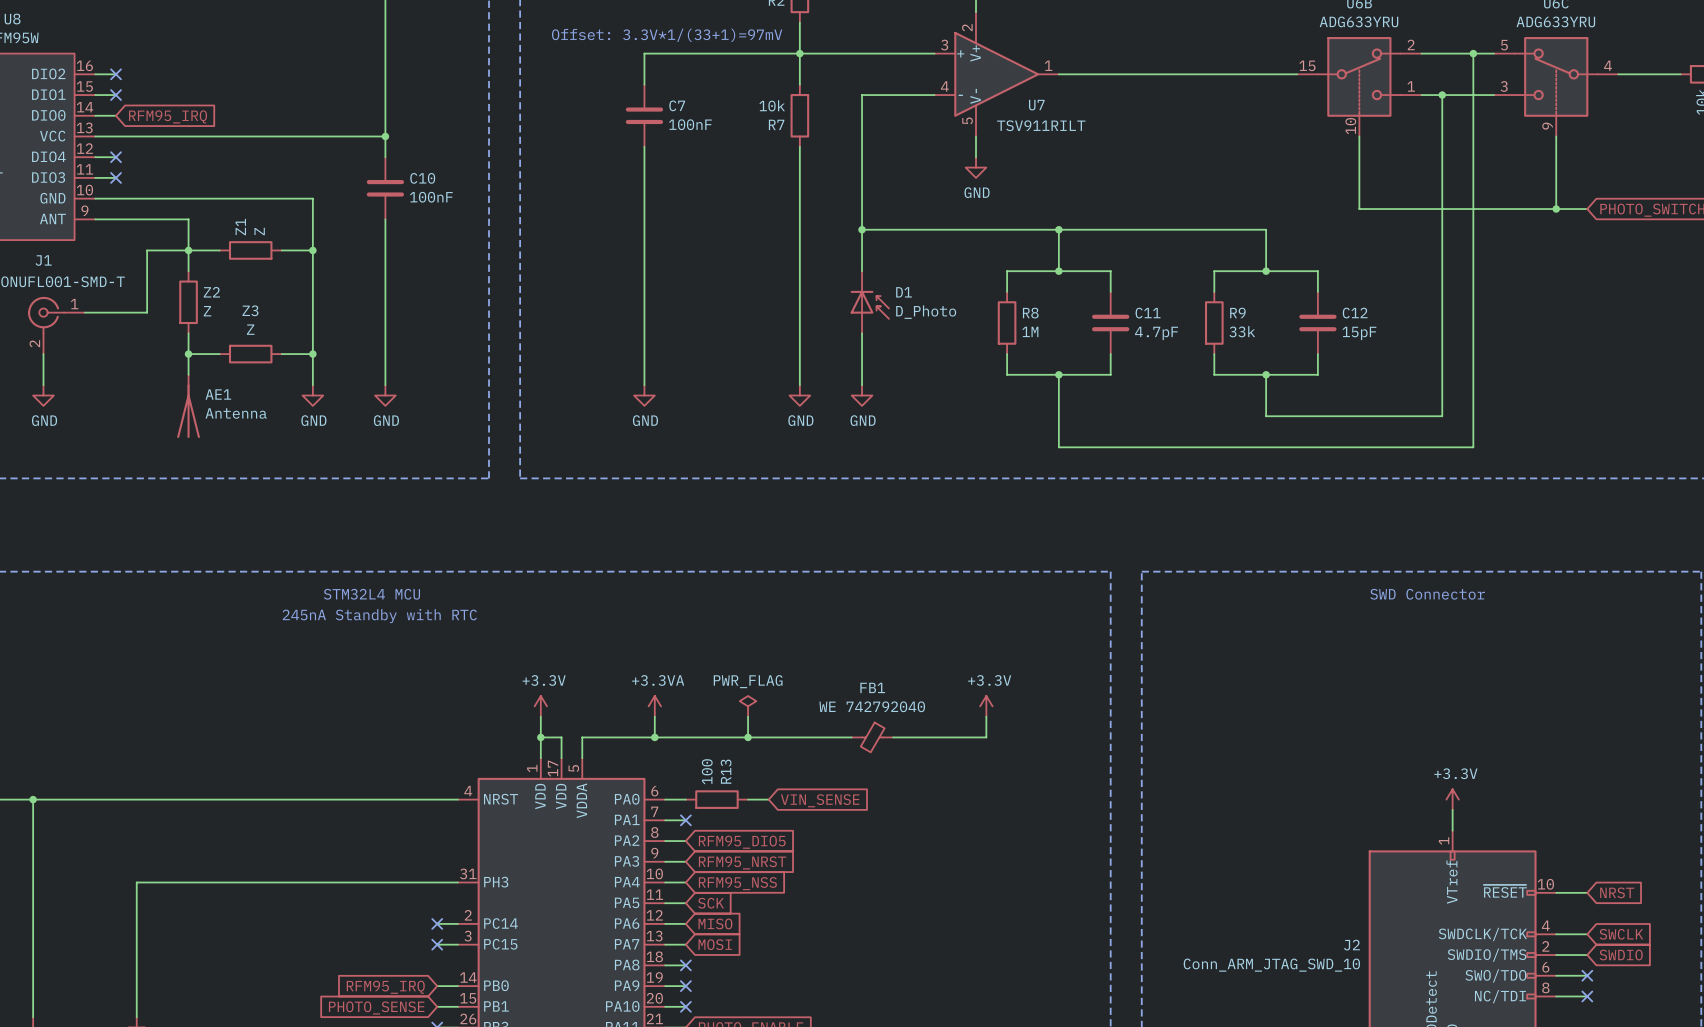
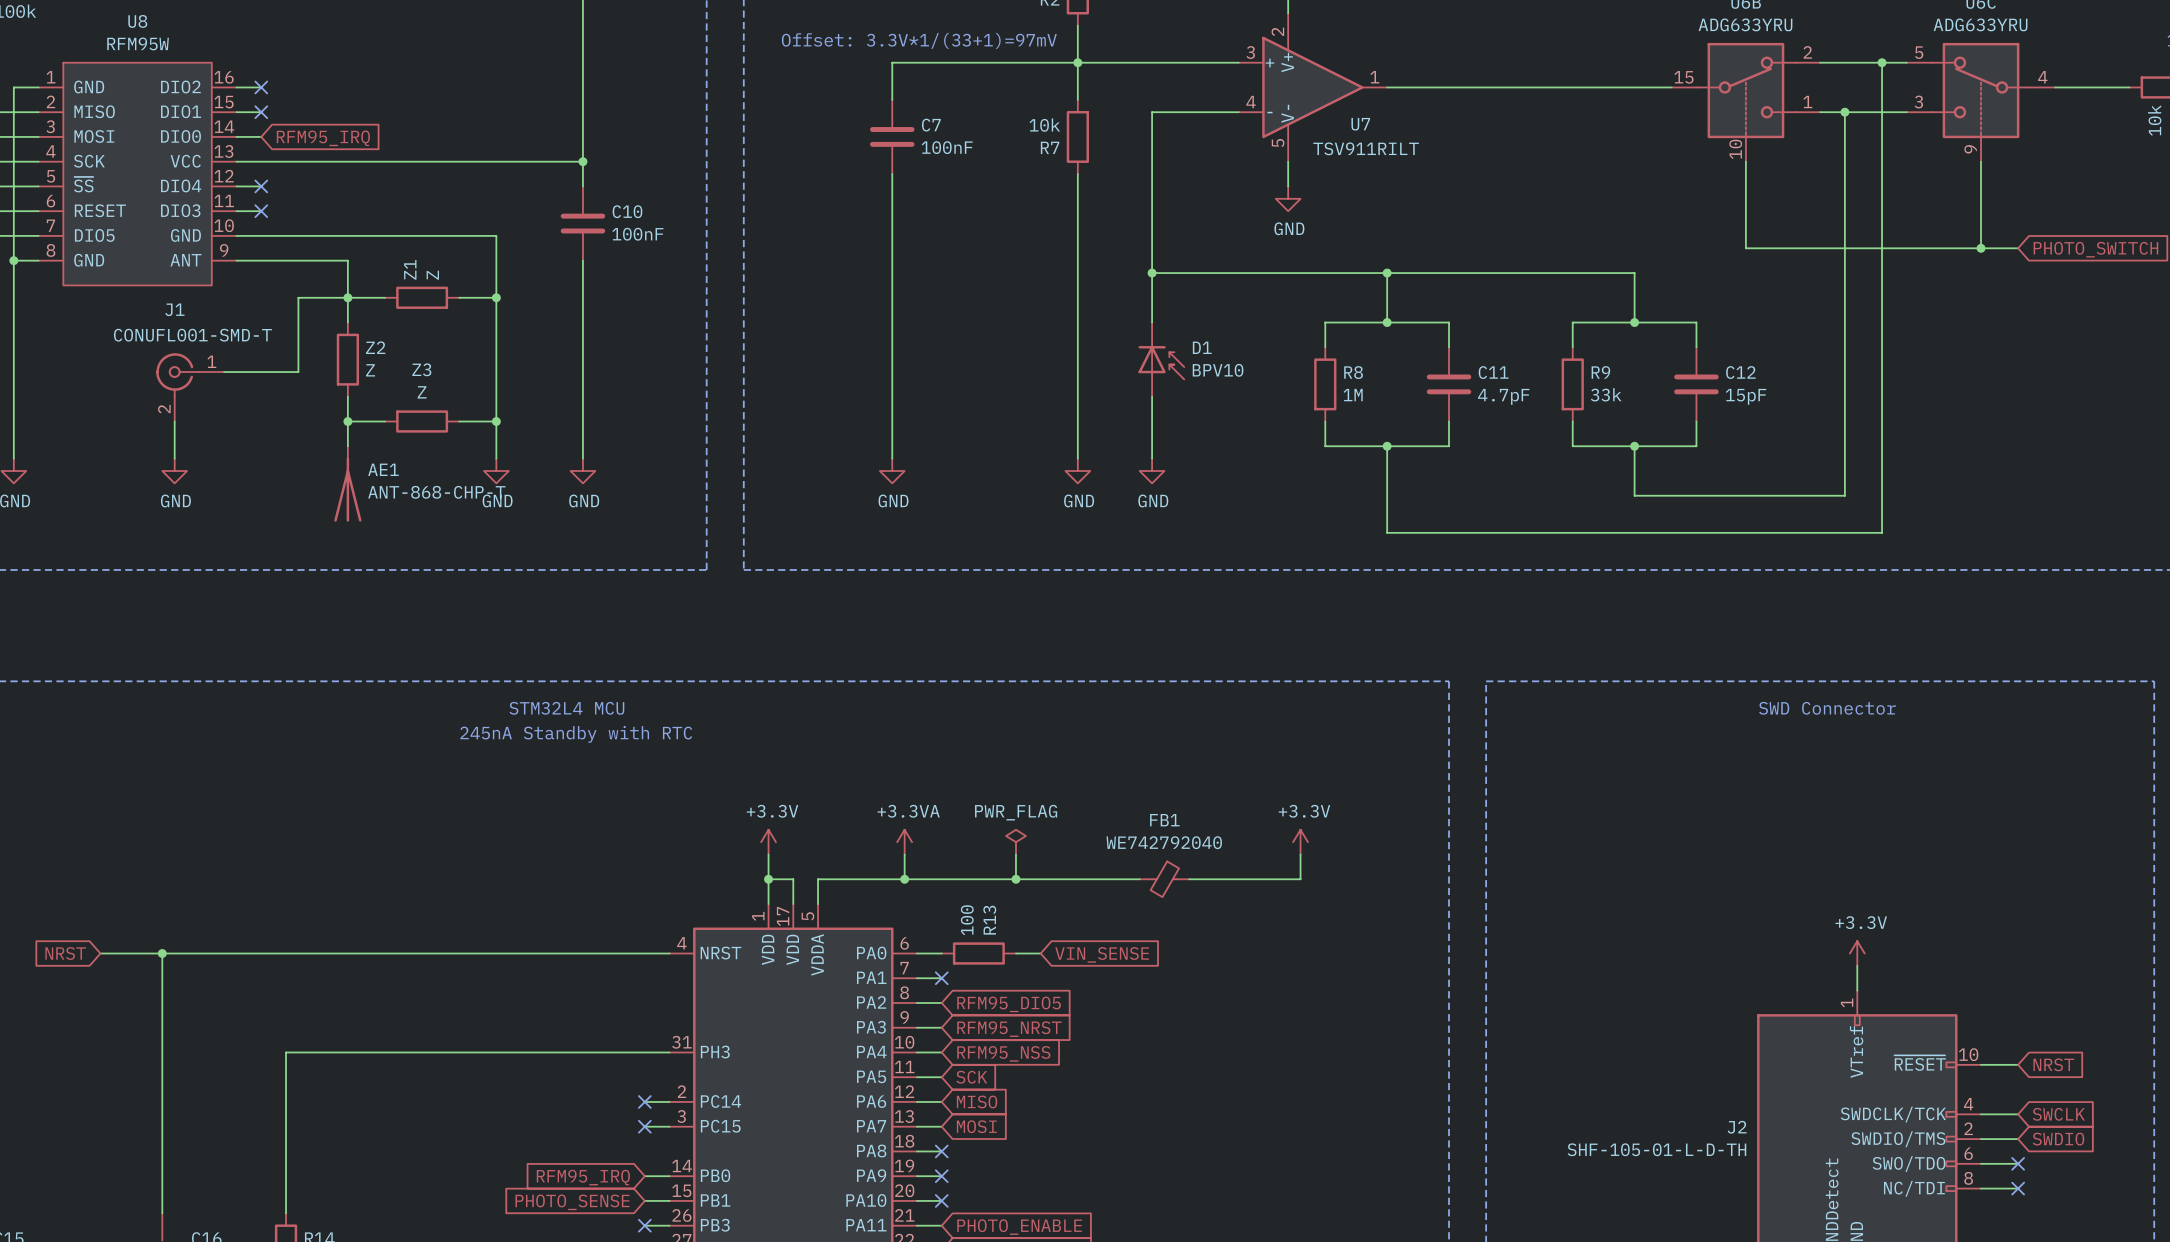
D1 value: D_Photo (926, 312) -> BPV10 (1218, 370)
AE1 value: Antenna (236, 413) -> ANT-868-CHP-T (436, 492)
FB1 value: WE 742792040 (872, 706) -> WE742792040 (1164, 842)
J2 value: Conn_ARM_JTAG_SWD_10 (1271, 965) -> SHF-105-01-L-D-TH (1656, 1149)

